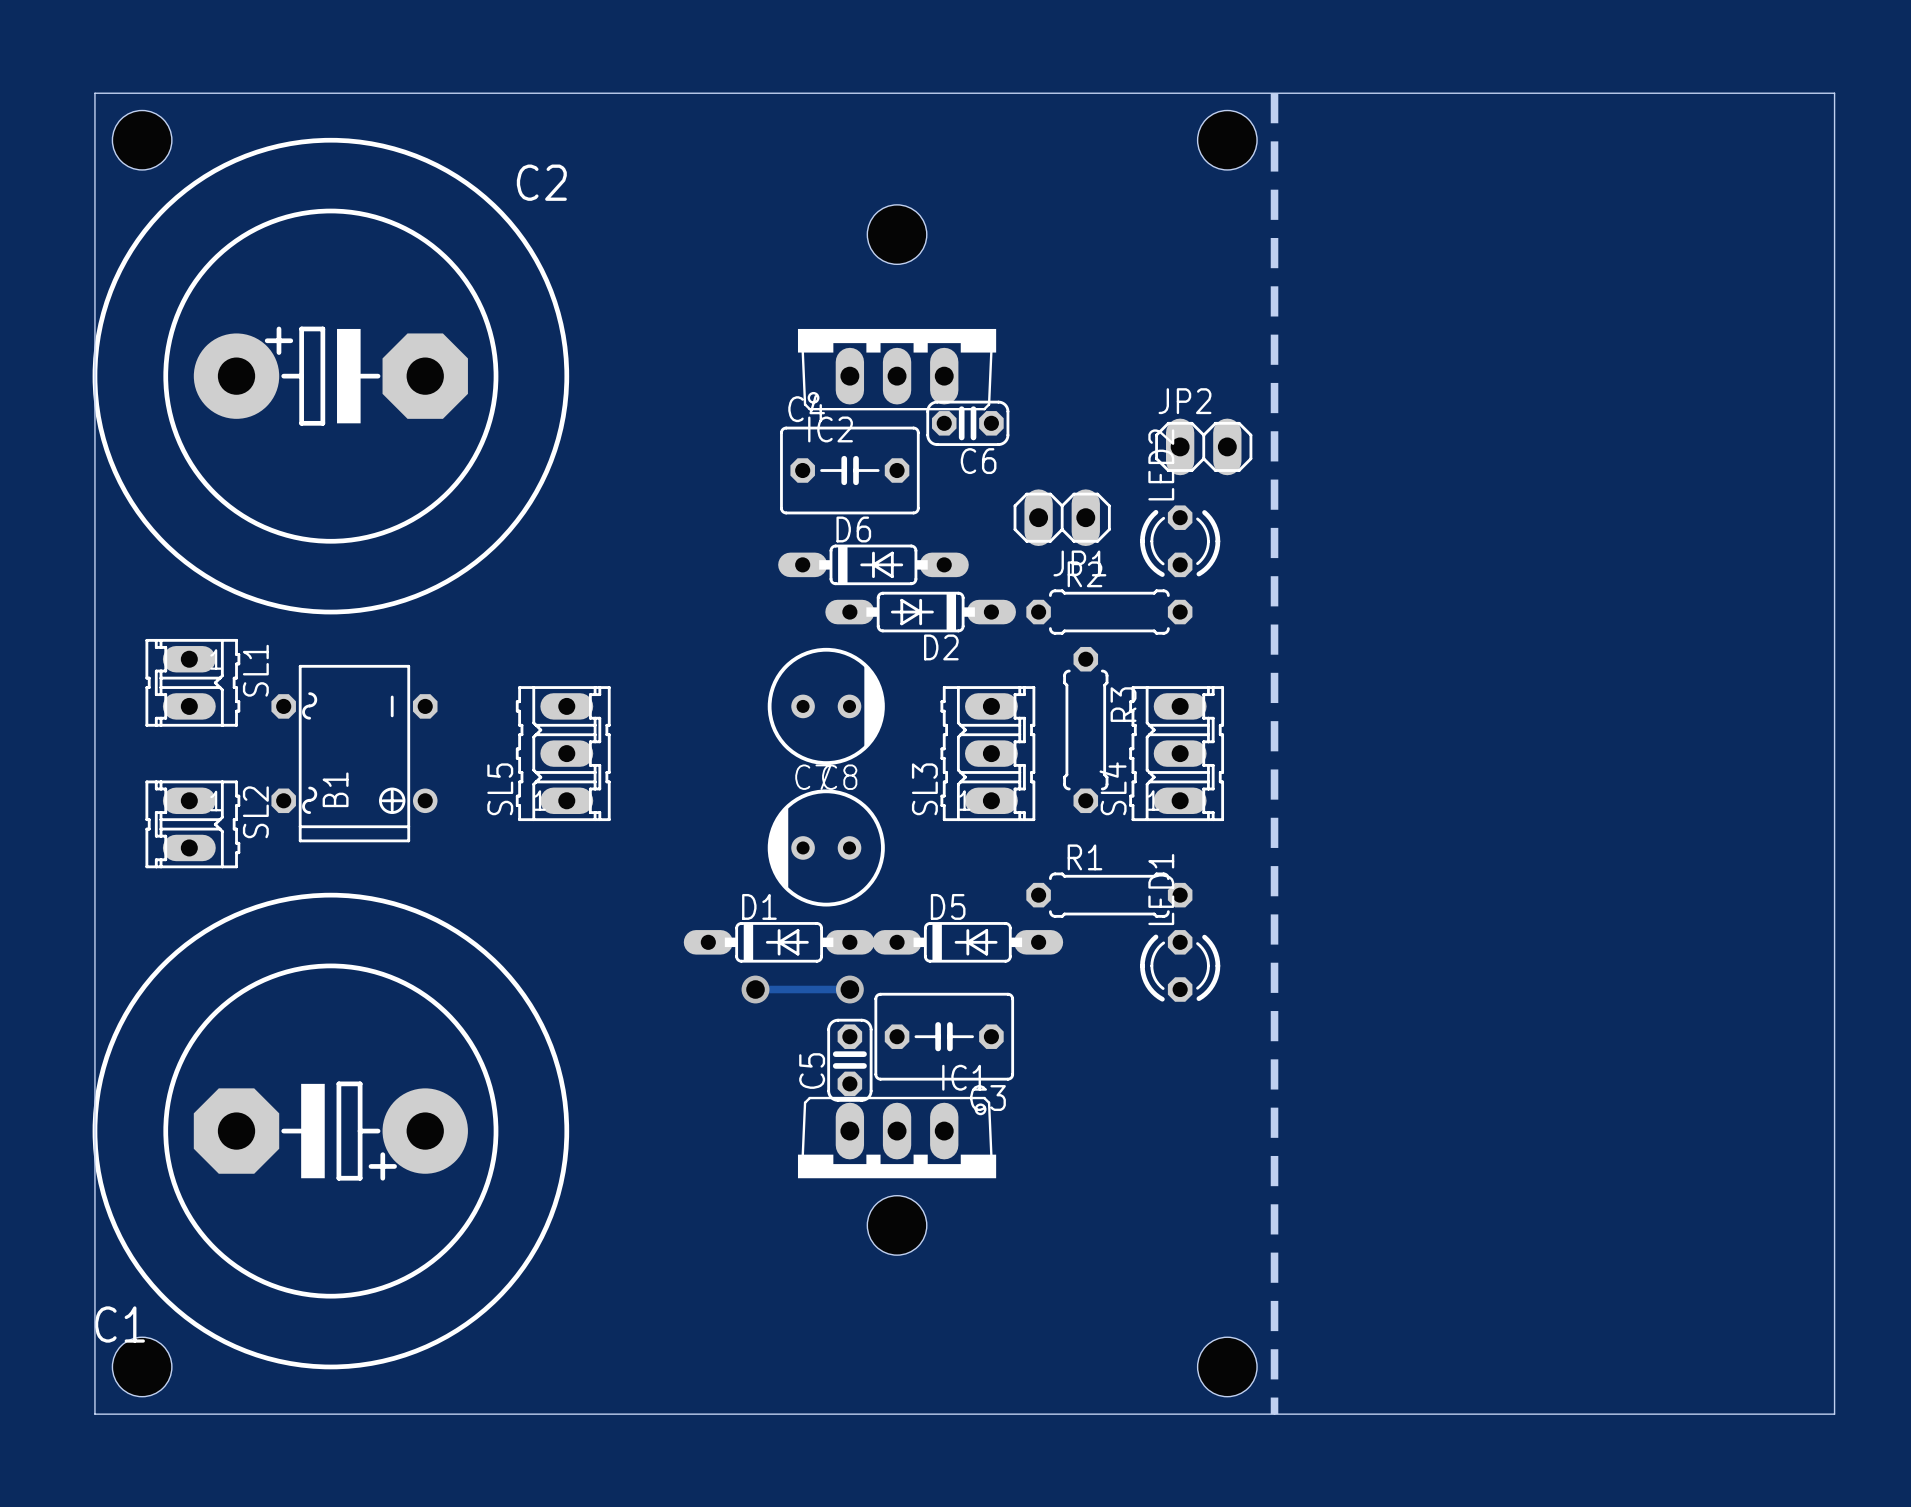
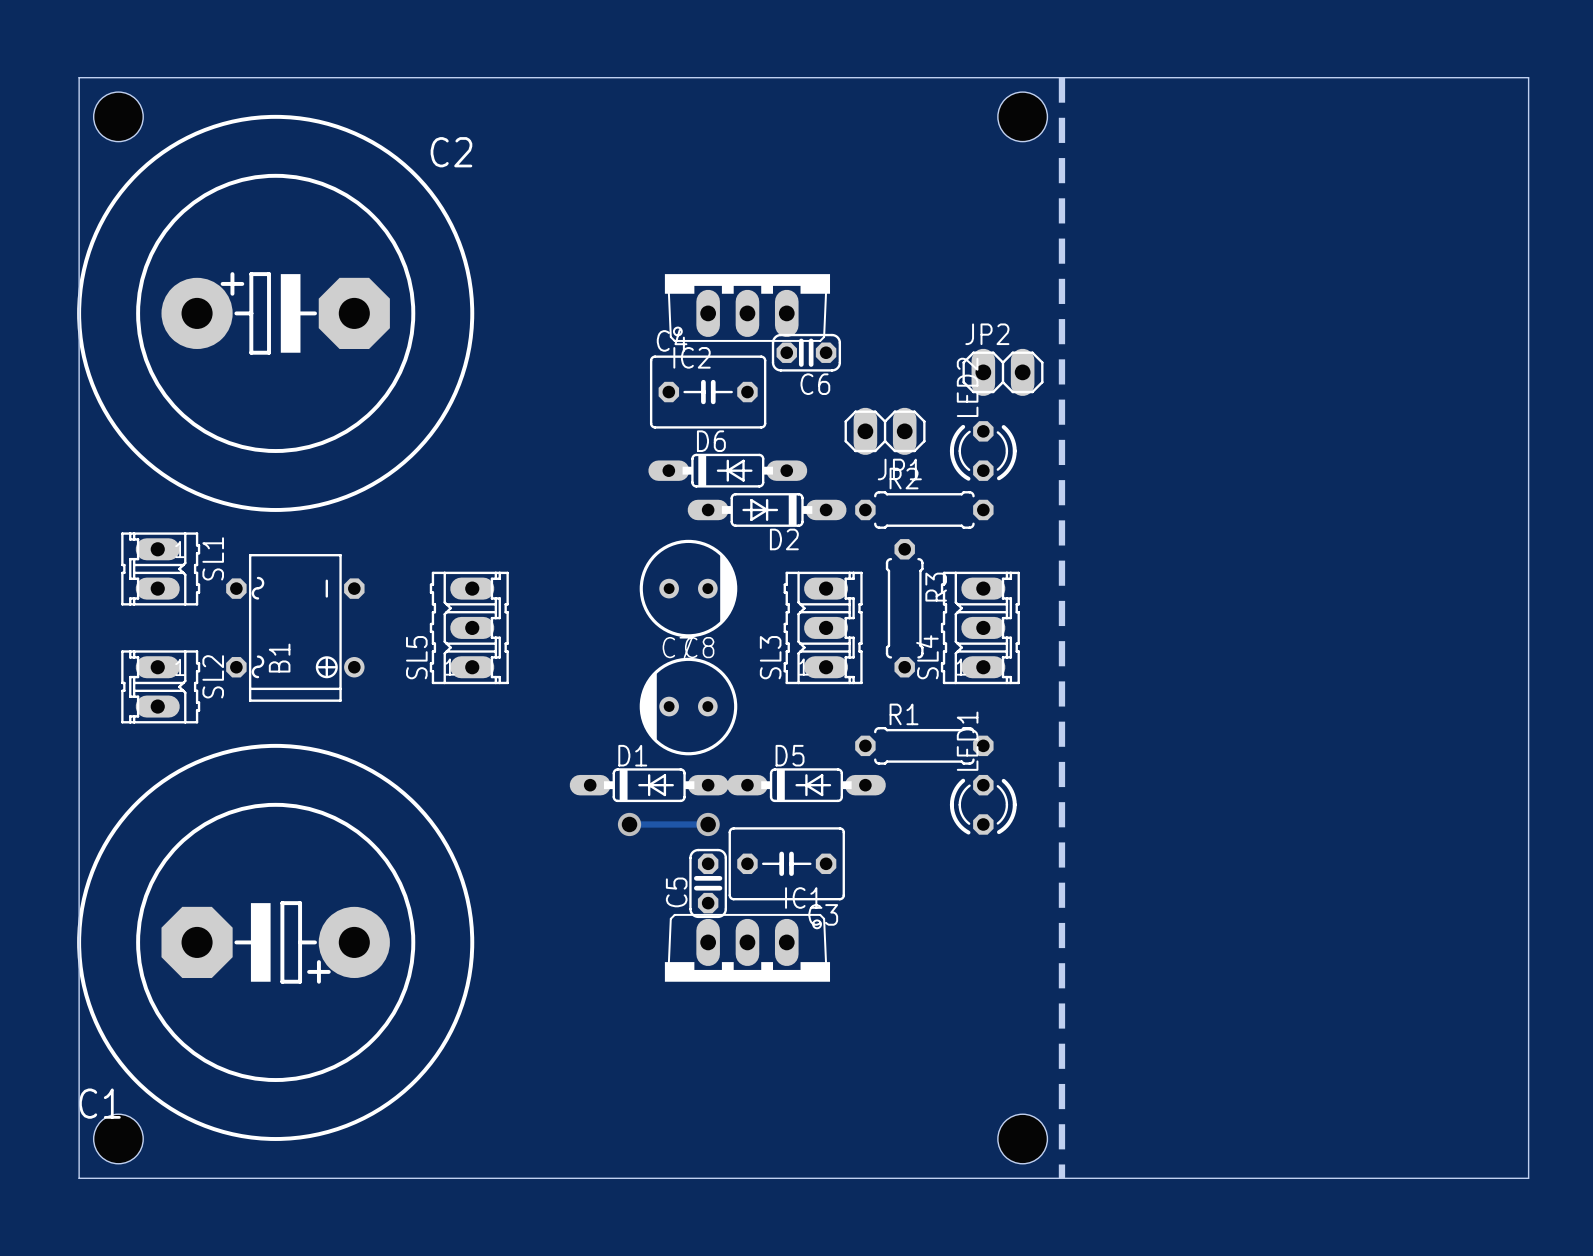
hole: (897, 234) -> none
hole: (897, 1225) -> none

